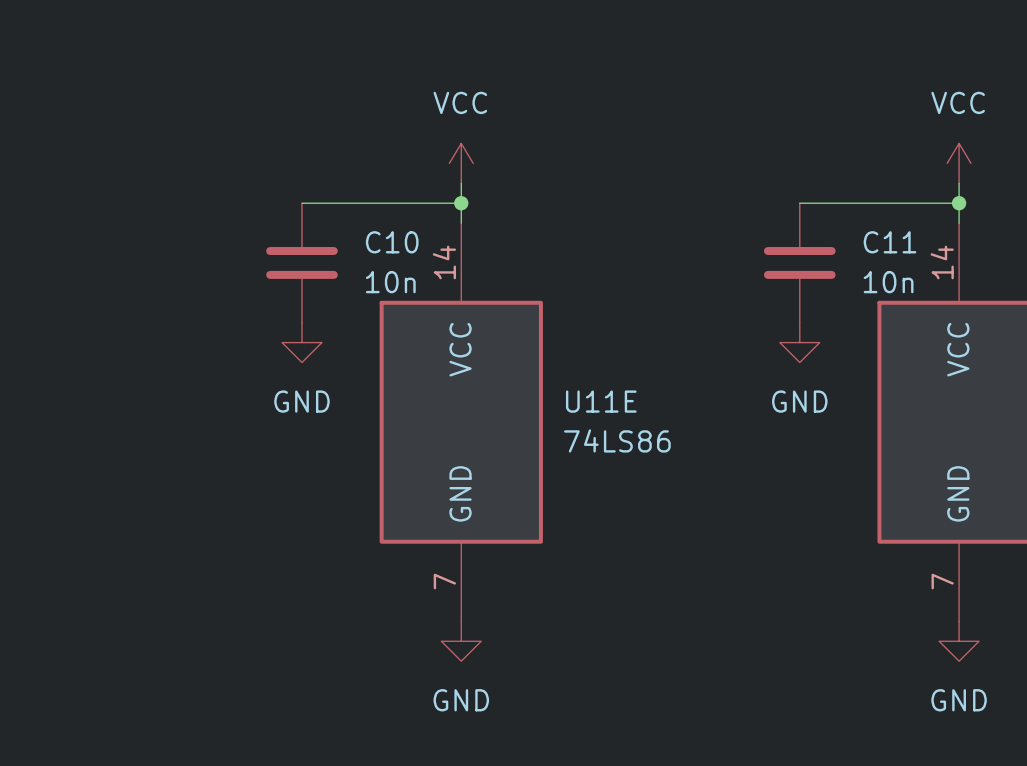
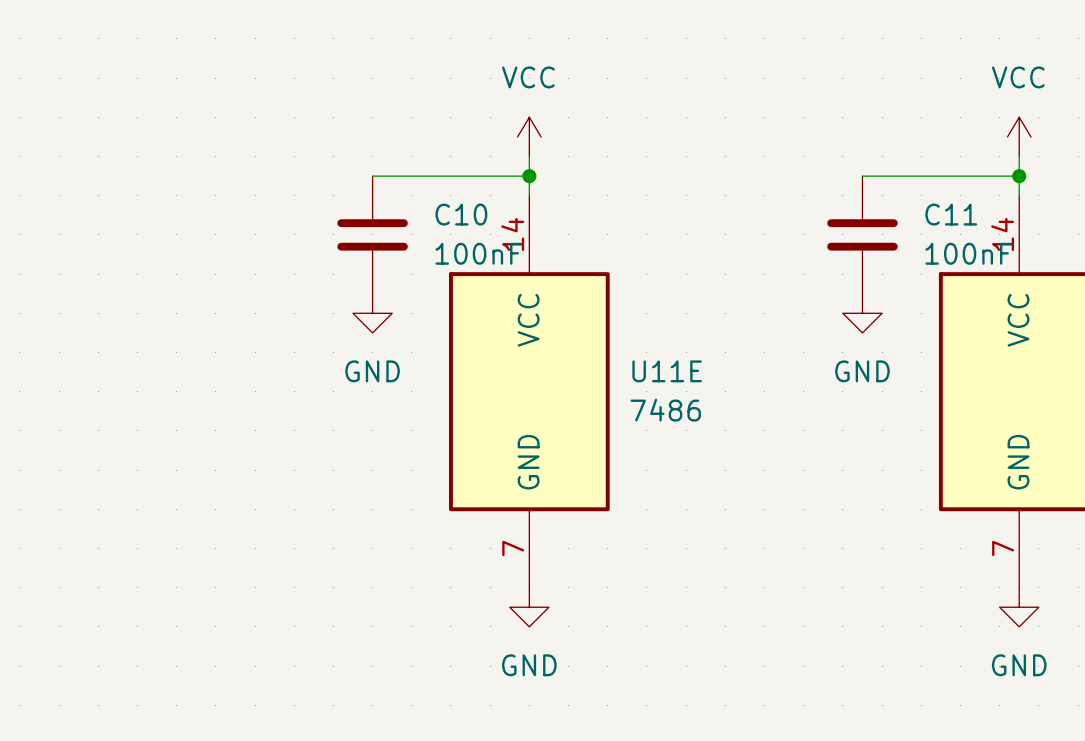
C10 value: 10n (390, 282) -> 100nF (478, 253)
C11 value: 10n (888, 282) -> 100nF (968, 253)
U11E value: 74LS86 (617, 440) -> 7486 (665, 410)

